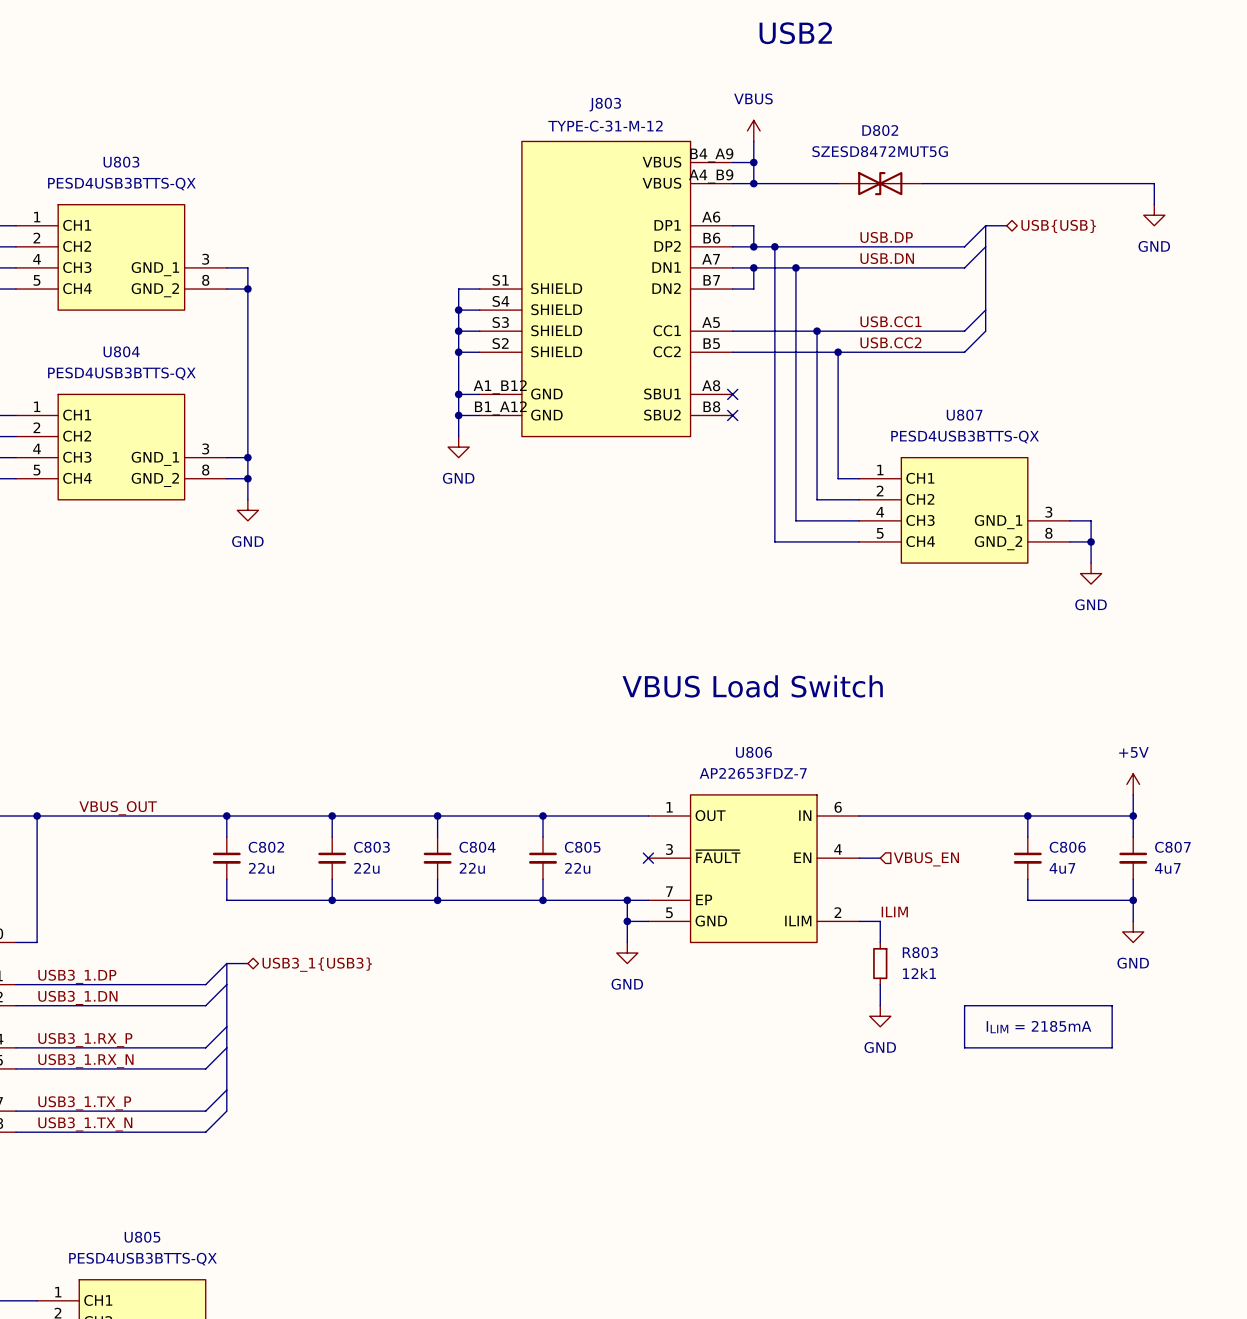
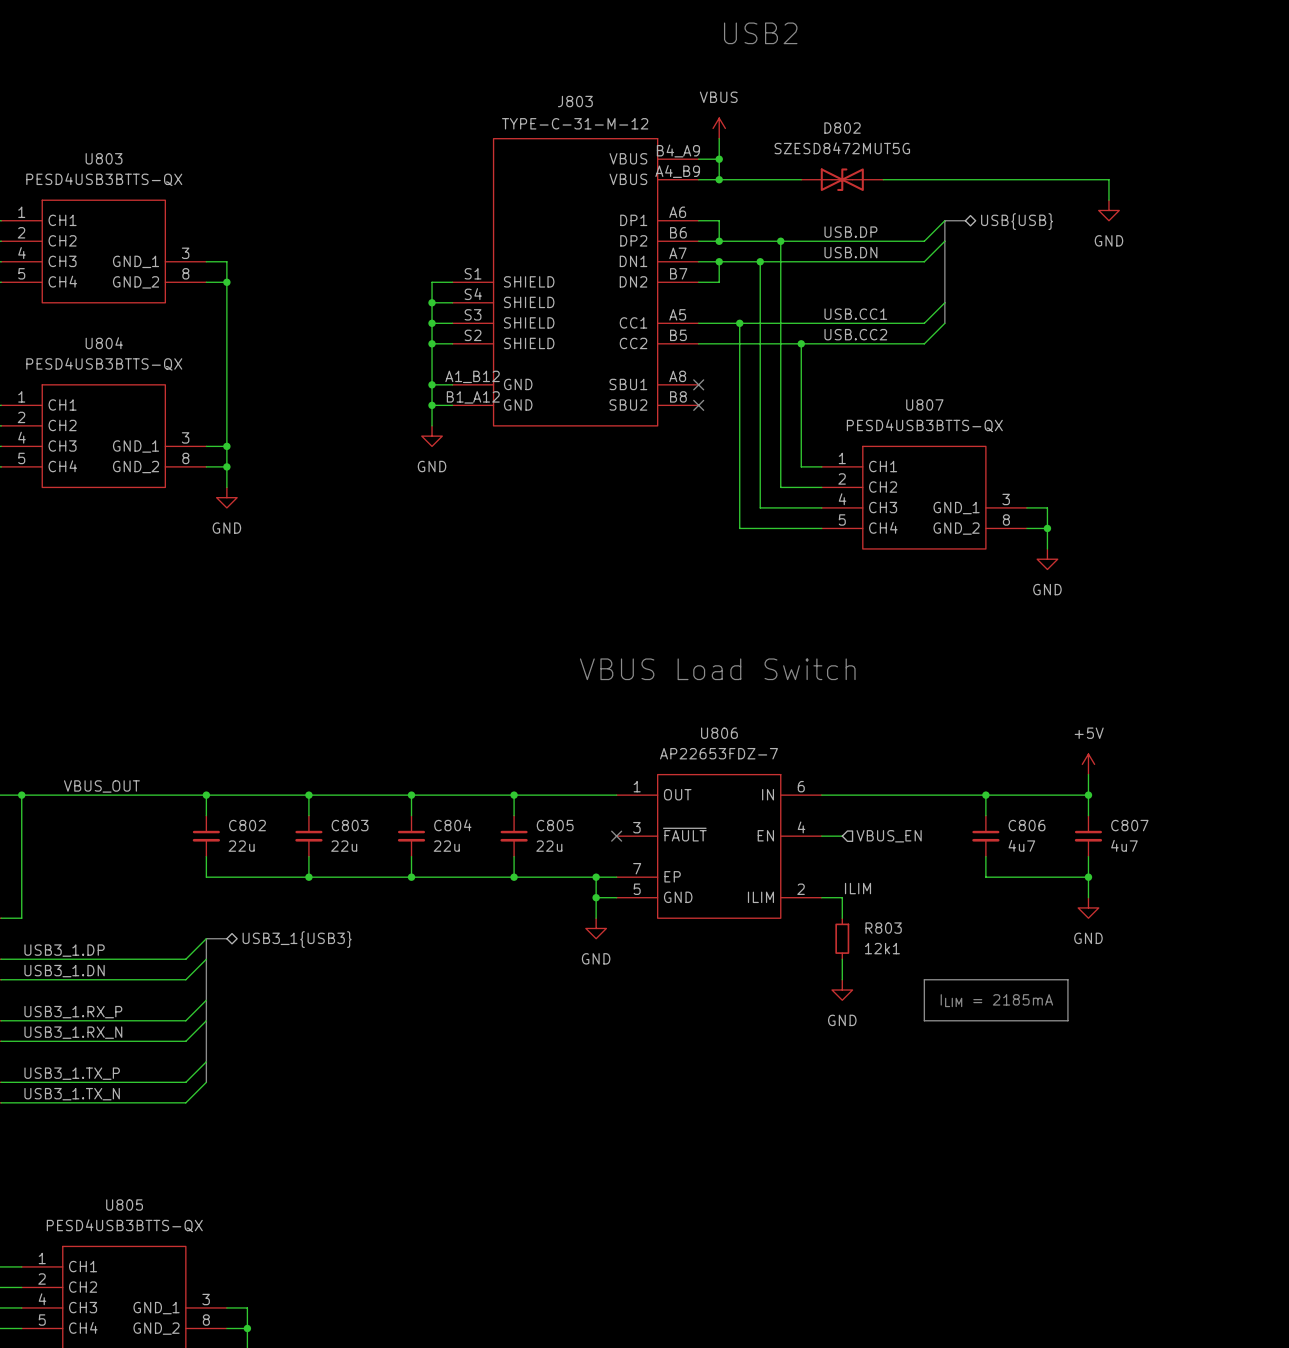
wire: (774, 246) (774, 331) -> (780, 241) (780, 323)
junction: (774, 246) -> none
junction: none -> (780, 241)
junction: none -> (739, 323)
junction: (817, 331) -> none

